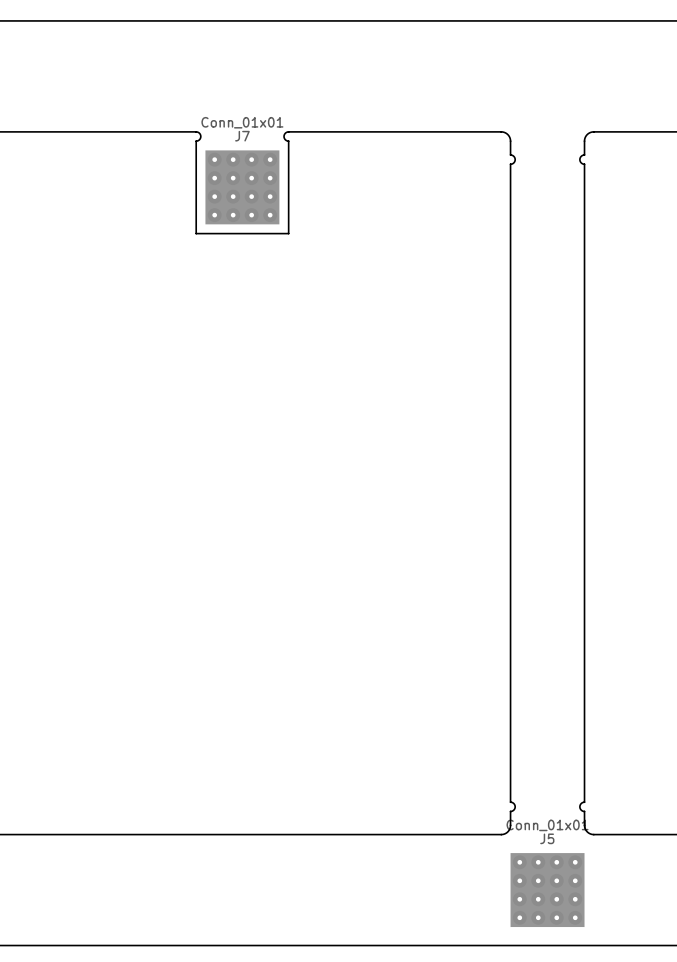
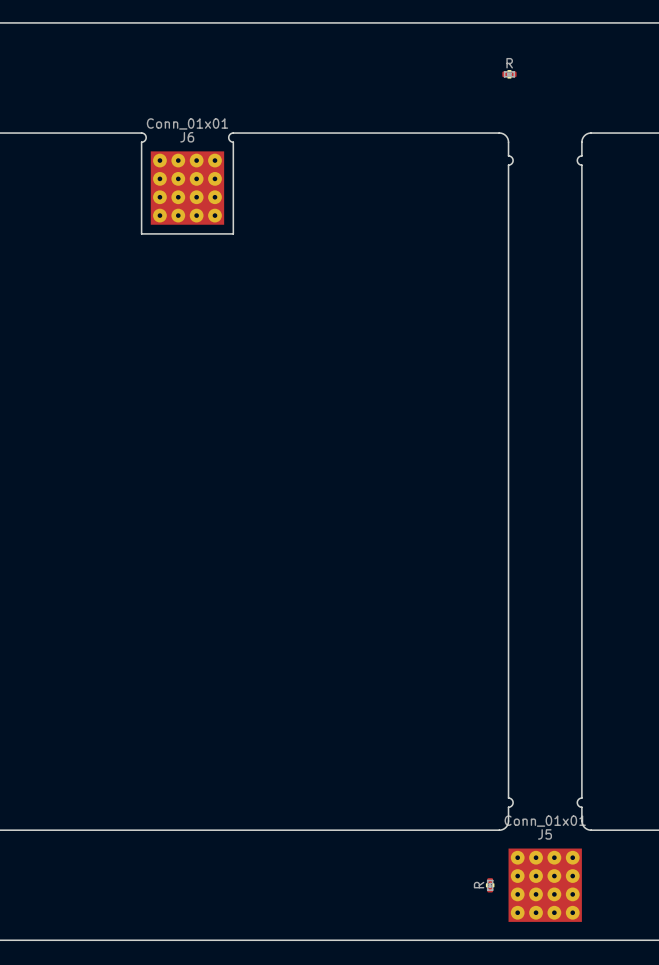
part: none -> R (509, 74)
board edge: (140, 131) (196, 131) (200, 134) (200, 138) (196, 141) (196, 233) -> (141, 133) (146, 137) (141, 142) (141, 233) (196, 233)
board edge: (288, 131) (284, 136) (288, 141) (288, 233) (233, 233) -> (288, 133) (233, 133) (229, 135) (229, 139) (233, 142) (233, 233)
J6: none -> Conn_01x01 (187, 188)
J7: Conn_01x01 (242, 187) -> none
part: none -> R (490, 885)

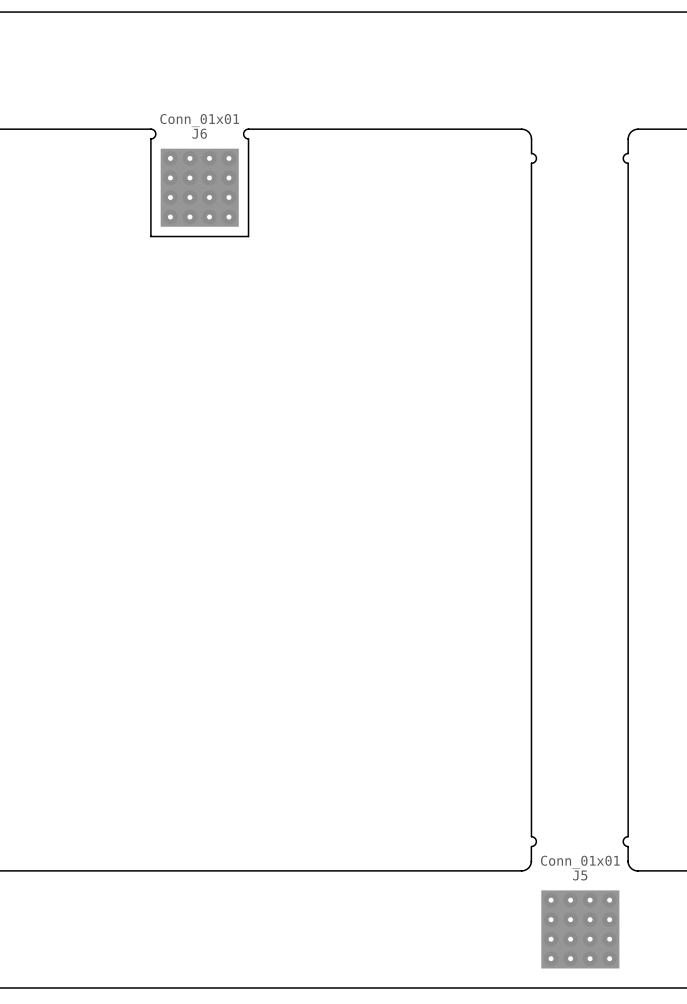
part: R (509, 74) -> none
board edge: (490, 133) (501, 133) (506, 136) (508, 155) (513, 160) (508, 165) (508, 798) (513, 802) (508, 807) (506, 826) (501, 829) (490, 830) -> (521, 129) (528, 132) (531, 139)
board edge: (599, 133) (589, 133) (583, 136) (581, 155) (577, 160) (581, 165) (581, 798) (577, 802) (581, 807) (583, 826) (588, 829) (599, 830) -> (637, 129) (631, 132) (628, 139)
board edge: none -> (531, 138) (531, 153) (536, 158) (531, 163)
board edge: none -> (628, 138) (628, 153) (623, 158) (628, 163)
board edge: none -> (531, 163) (531, 836)
board edge: none -> (628, 163) (628, 836)
board edge: none -> (531, 836) (536, 841) (531, 846)
board edge: none -> (628, 836) (623, 841) (628, 846)
board edge: none -> (531, 846) (531, 861)
board edge: none -> (628, 846) (628, 861)
board edge: none -> (531, 861) (528, 868) (521, 870)
board edge: none -> (628, 861) (630, 868) (637, 870)
part: R (490, 885) -> none

